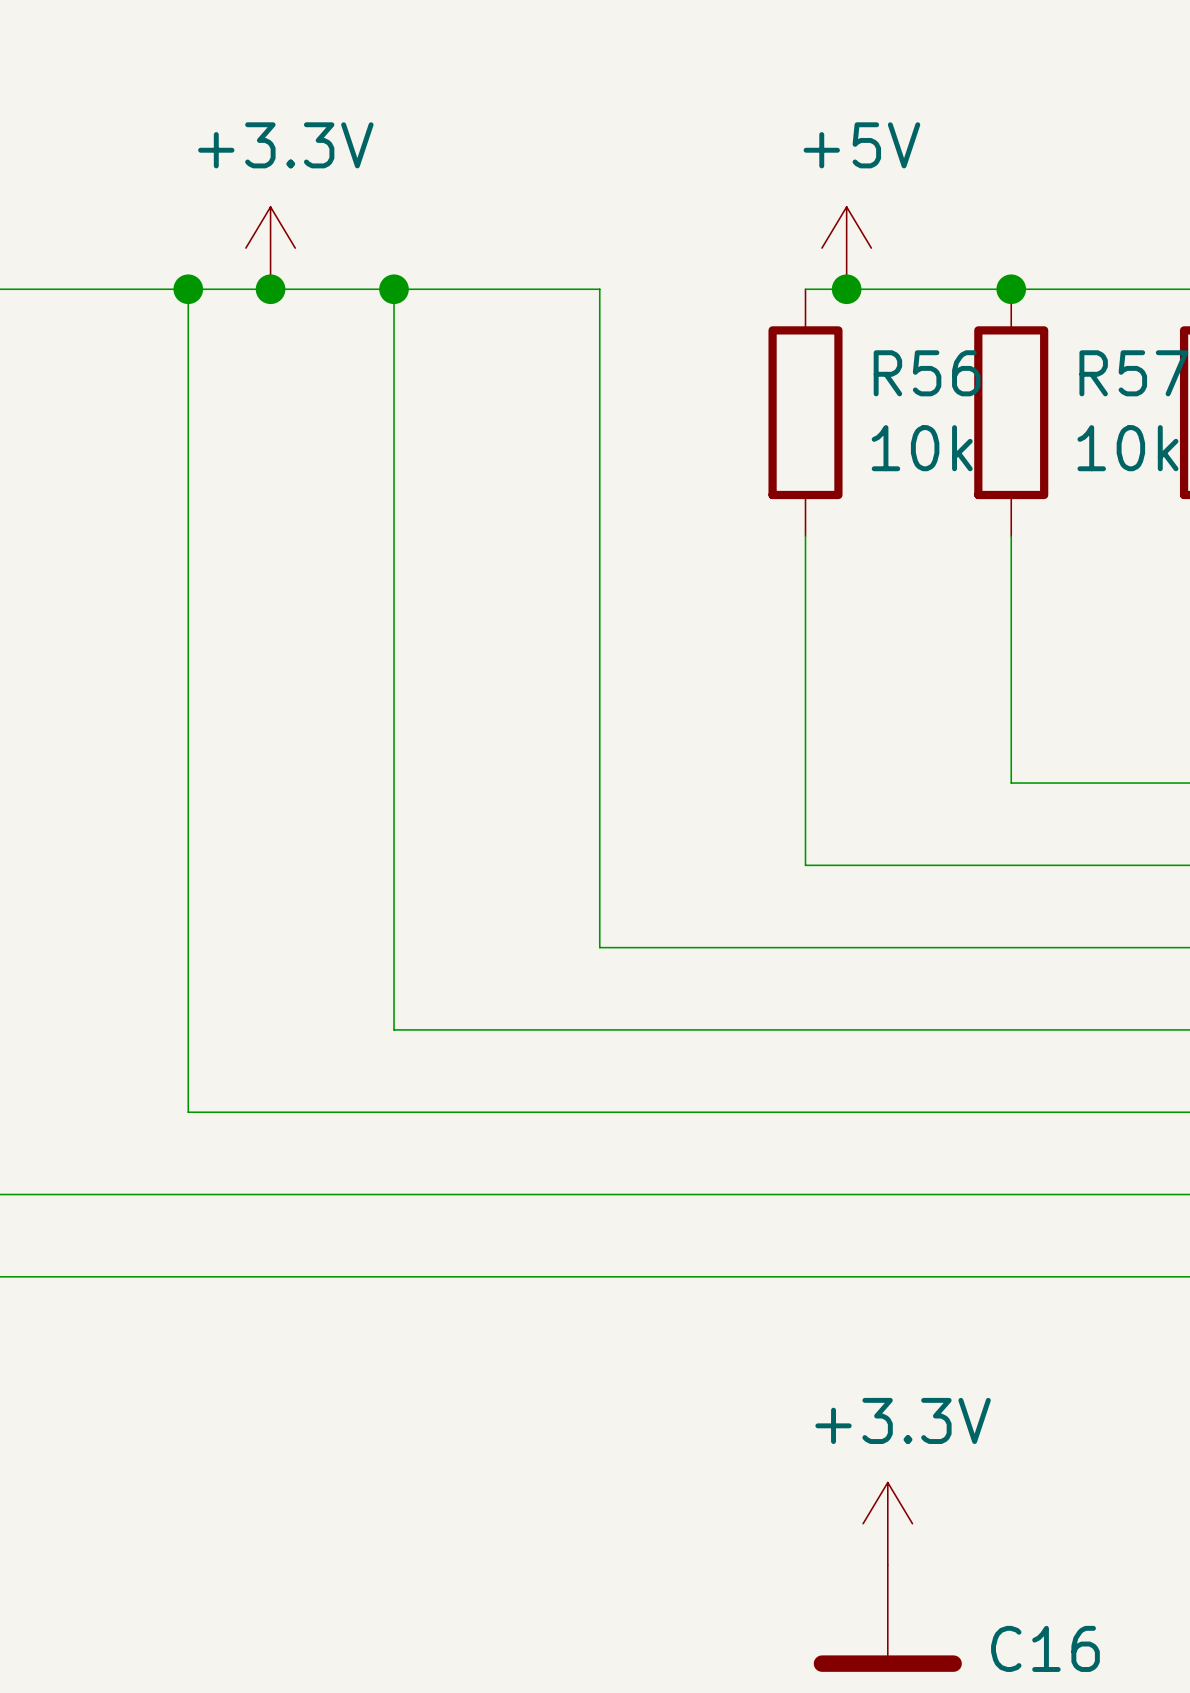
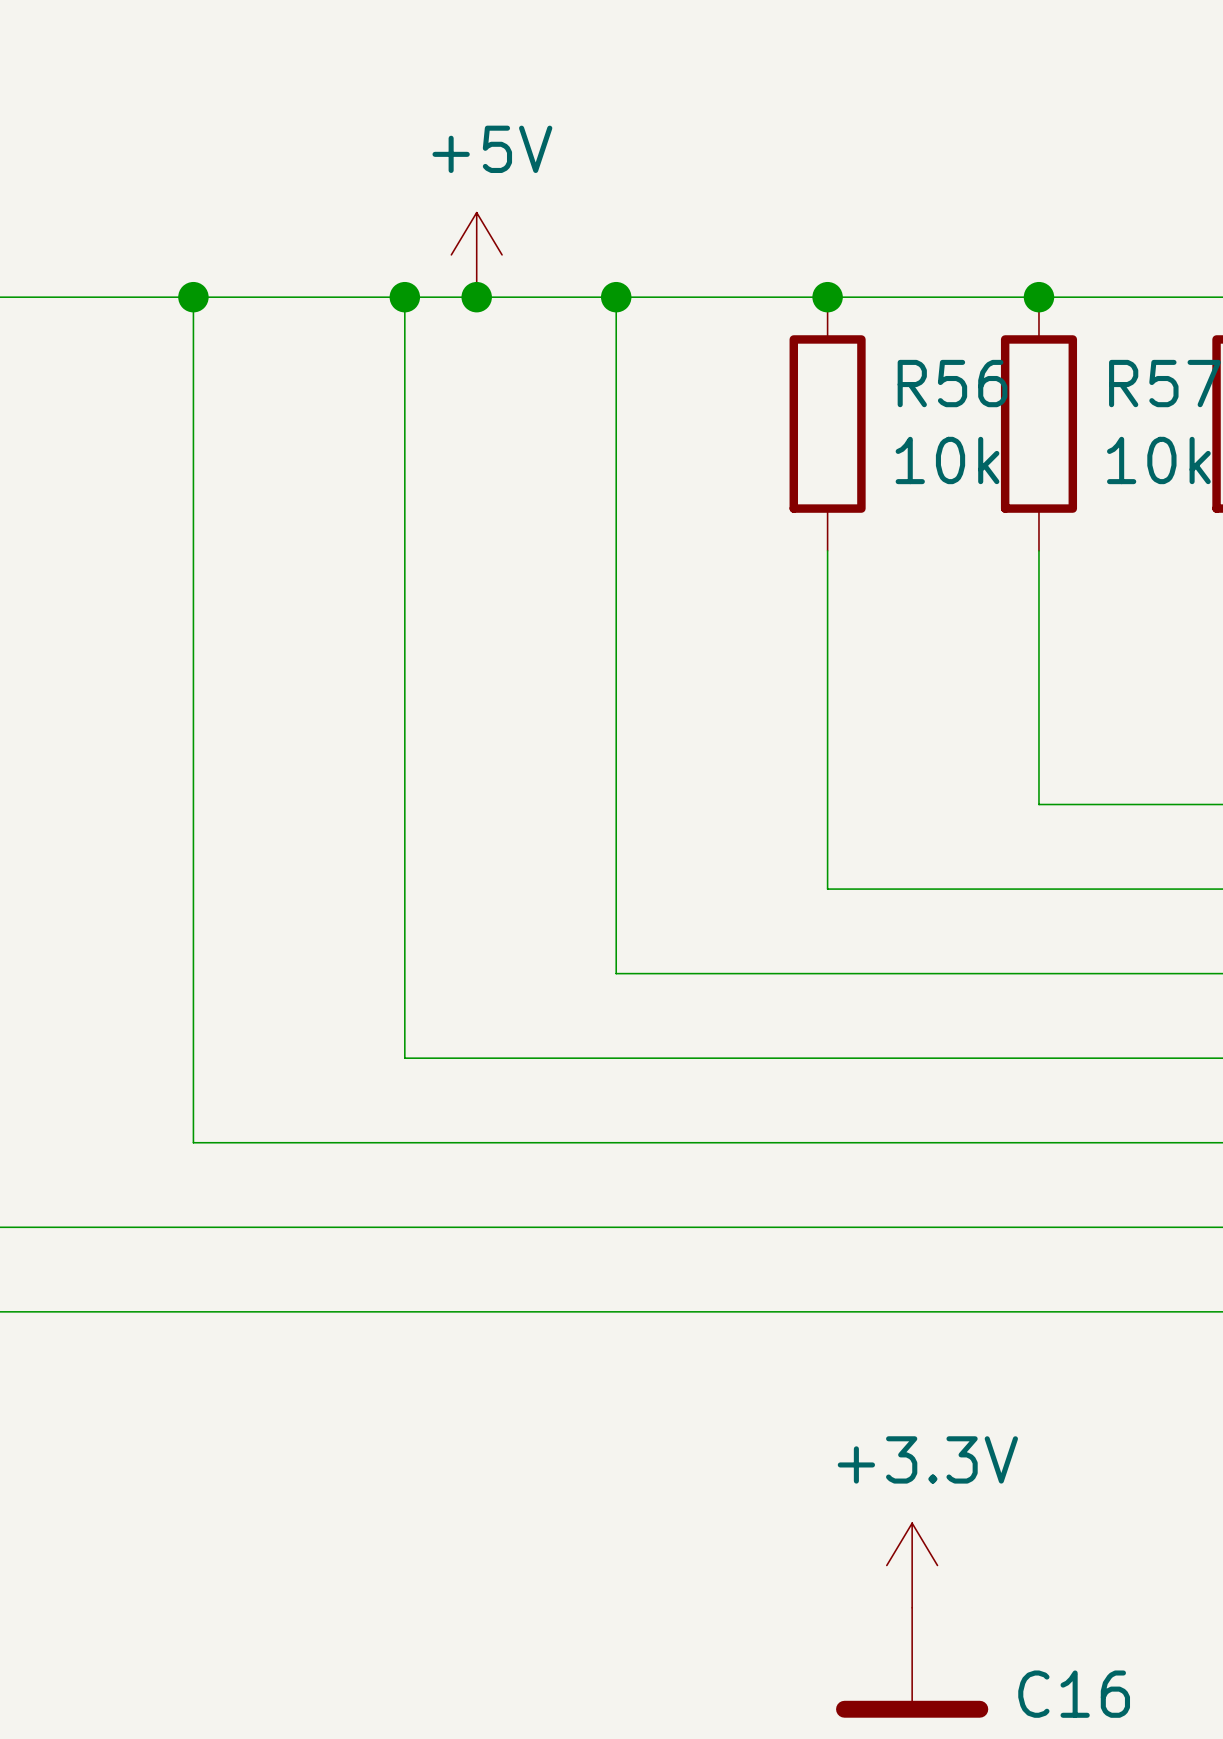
power symbol: +3.3V (270, 248) -> none
power symbol position: +5V (846, 248) -> +5V (476, 254)
junction: (270, 289) -> none
junction: none -> (476, 297)
wire: none -> (616, 297) (827, 297)
junction: none -> (616, 297)
junction position: (846, 289) -> (827, 297)

